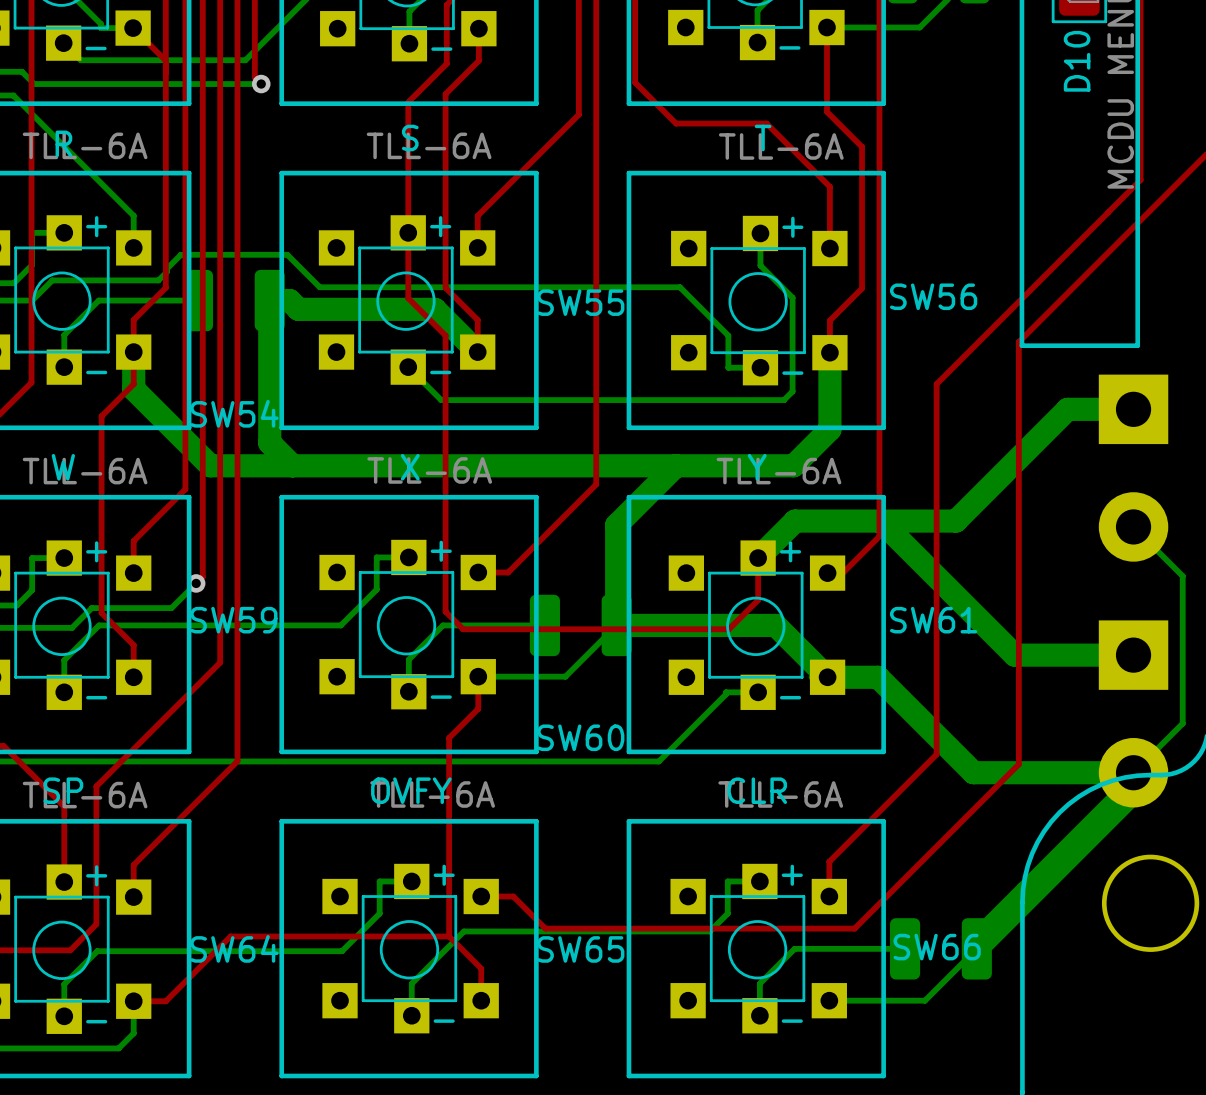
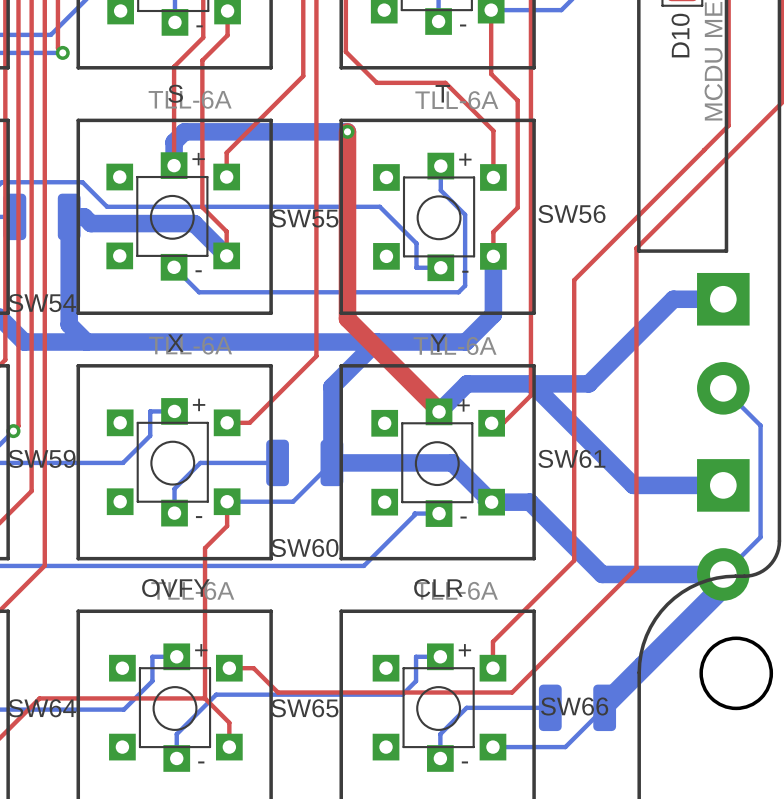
bottom track: none -> (347, 131) (184, 131) (174, 142) (174, 165)
via: none -> (347, 131)
top track: (408, 232) (408, 298) (445, 335) (445, 611) (463, 629) (728, 629) (758, 600) (758, 558) -> (347, 131) (347, 318) (439, 411)

